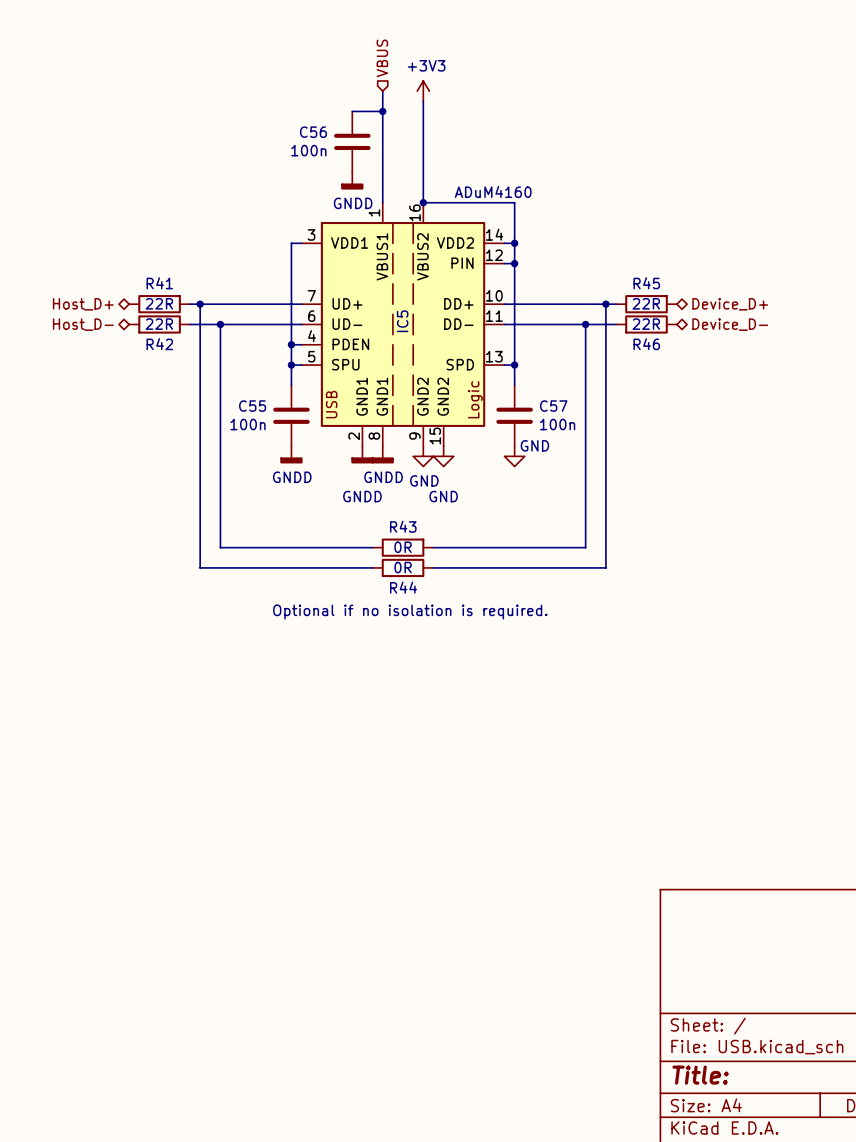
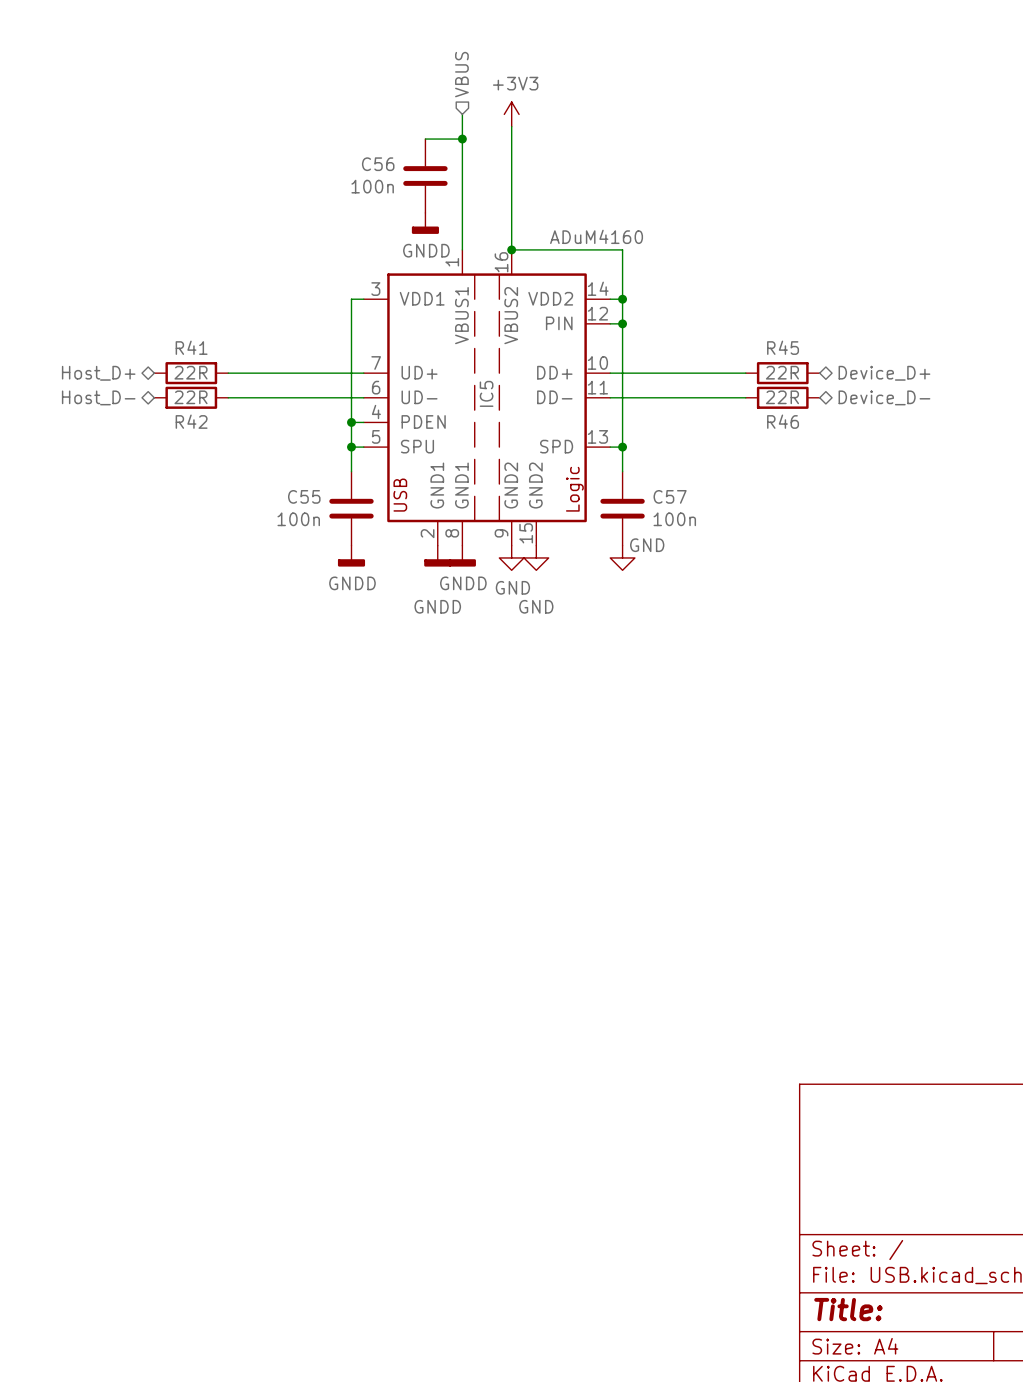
wire: (200, 304) (200, 567) (372, 567) -> none
junction: (200, 304) -> none
wire: (605, 304) (605, 567) (433, 567) -> none
junction: (605, 304) -> none
wire: (220, 324) (220, 547) (372, 547) -> none
junction: (220, 324) -> none
wire: (585, 324) (585, 547) (433, 547) -> none
junction: (585, 324) -> none
R43: 0R (403, 547) -> none
R44: 0R (403, 567) -> none
text: Optional if no isolation is required. (410, 612) -> none

